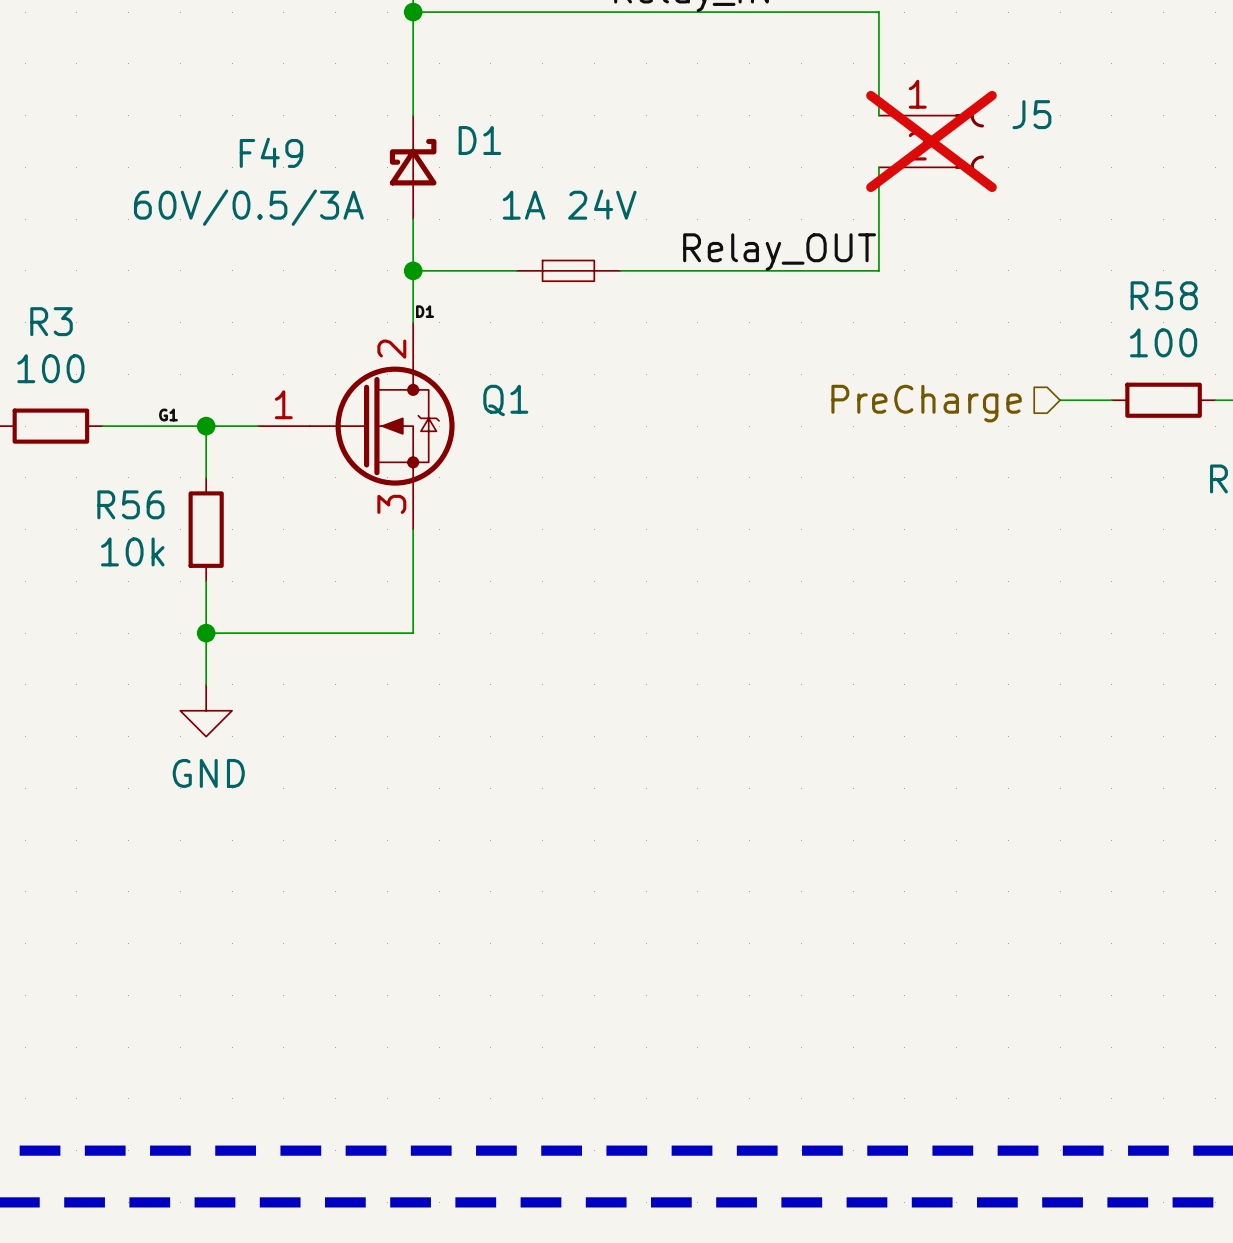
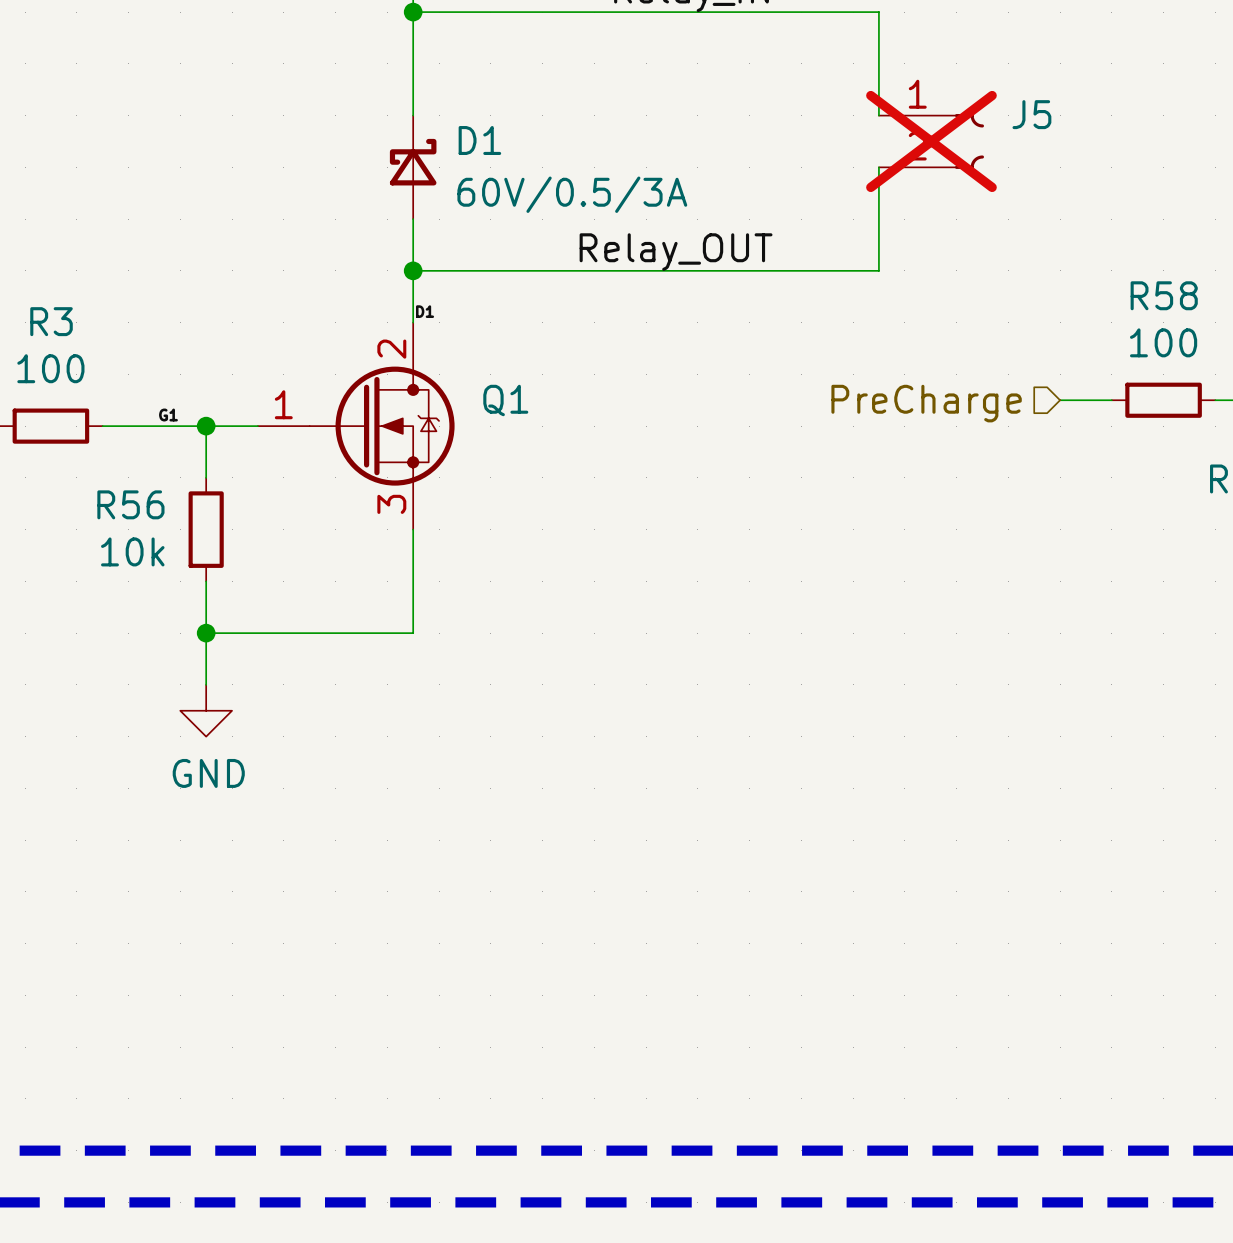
D1 value position: 60V/0.5/3A (248, 207) -> 60V/0.5/3A (572, 194)
label position: Relay_OUT (779, 252) -> Relay_OUT (676, 252)
F49: 1A 24V (568, 270) -> none

